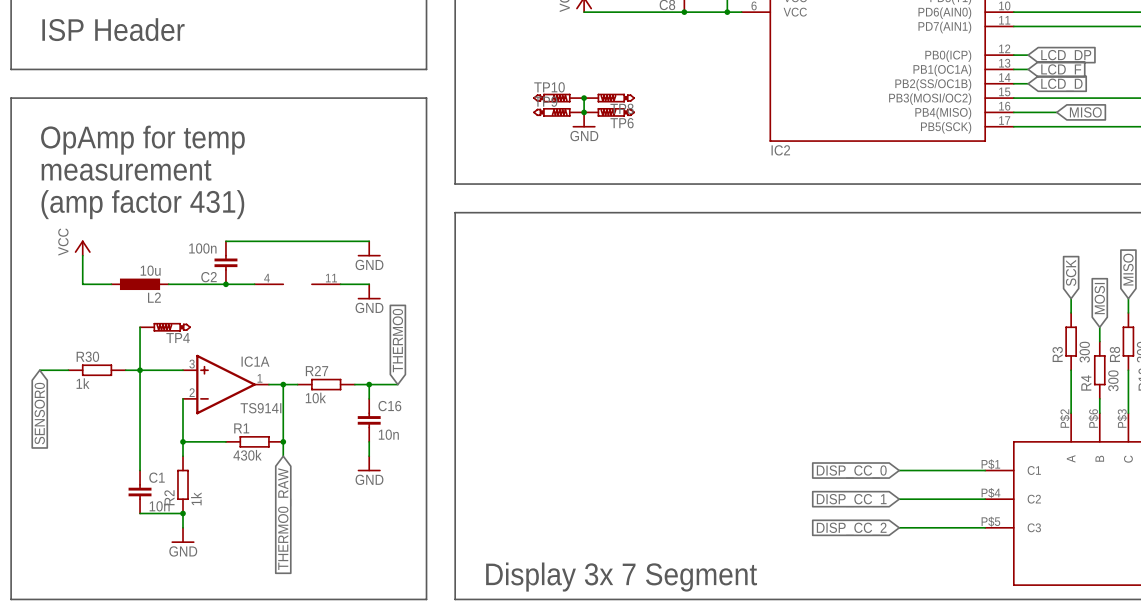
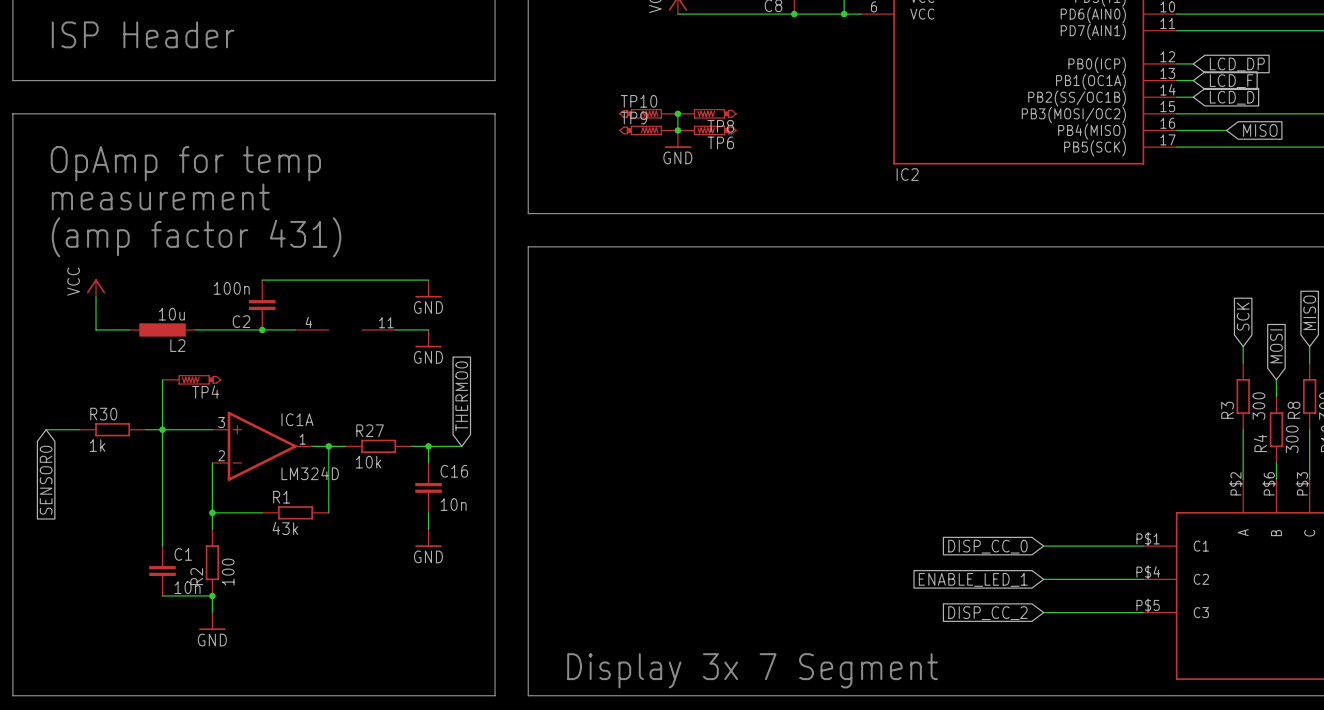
IC1A value: TS914I (260, 408) -> LM324D (310, 473)
wire: (283, 441) (283, 456) -> none
junction: (283, 441) -> none
R1 value: 430k (247, 455) -> 43k (285, 528)
R2 value: 1k (196, 498) -> 100 (228, 572)
global label: DISP_CC_1 (851, 500) -> ENABLE_LED_1 (973, 579)
global label: THERMO0_RAW (284, 519) -> none

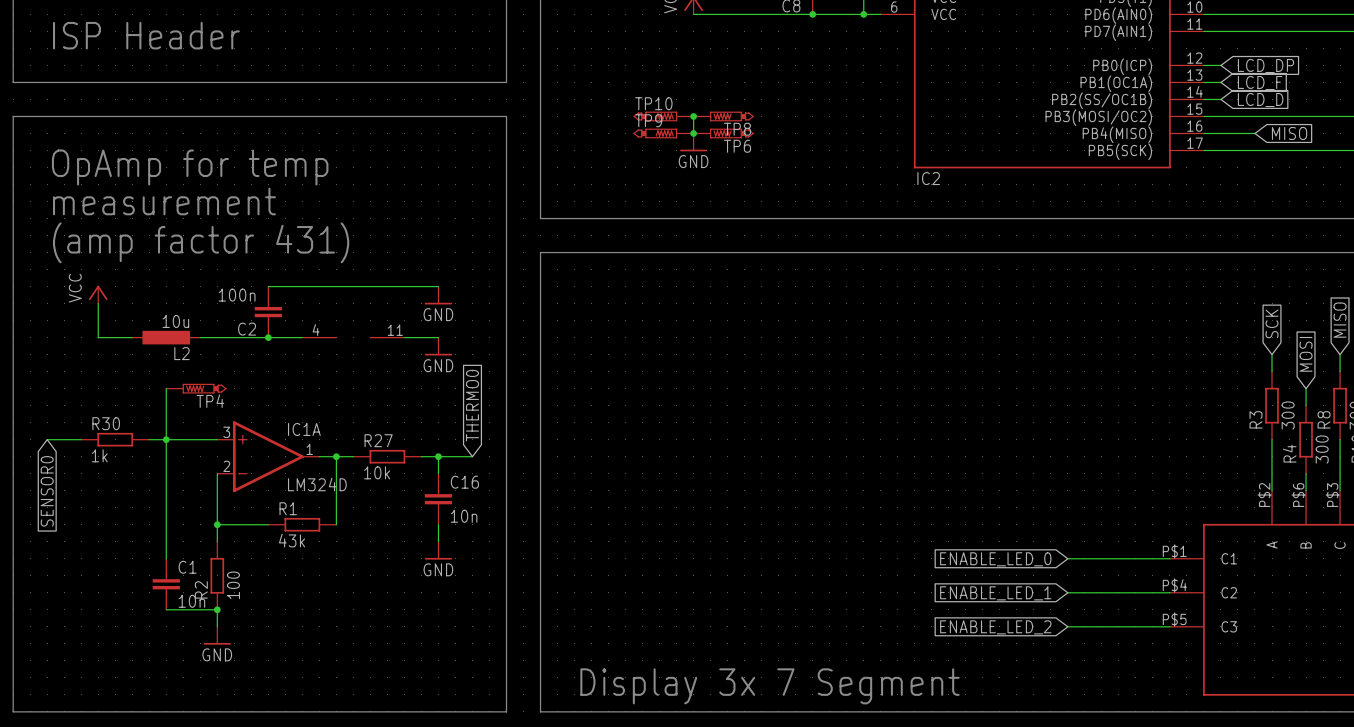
global label: DISP_CC_0 (987, 546) -> ENABLE_LED_0 (995, 559)
global label: DISP_CC_2 (987, 613) -> ENABLE_LED_2 (995, 627)

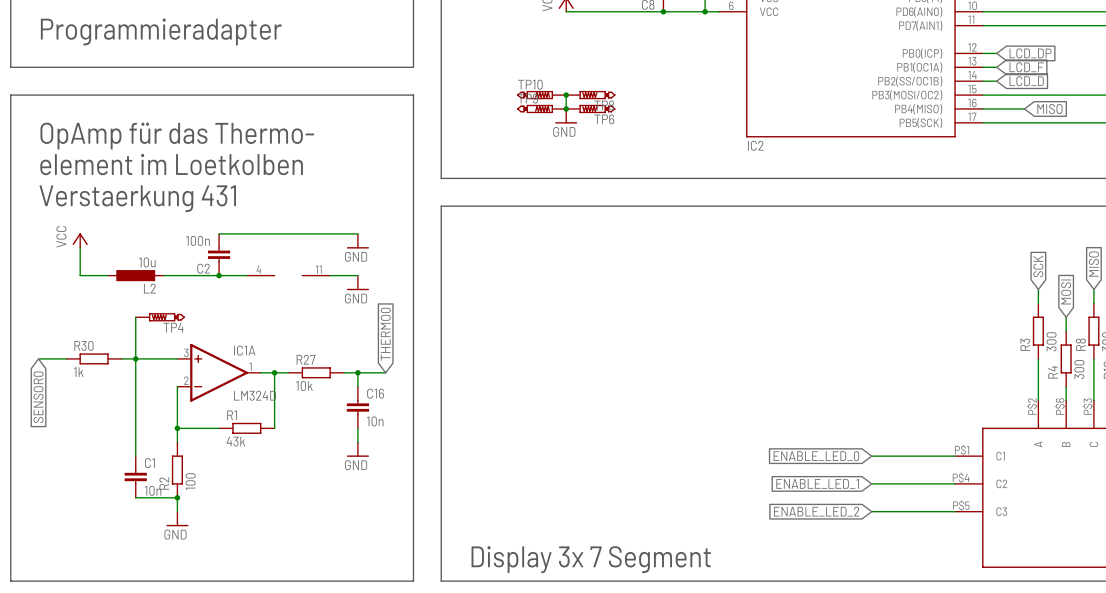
text: ISP Header (146, 35) -> Programmieradapter (161, 31)
text: OpAmp for temp (190, 167) -> OpAmp für das Thermo- (177, 136)
text: measurement (164, 201) -> element im Loetkolben (171, 164)
text: (amp factor 431) (201, 242) -> Verstaerkung 431 (137, 198)

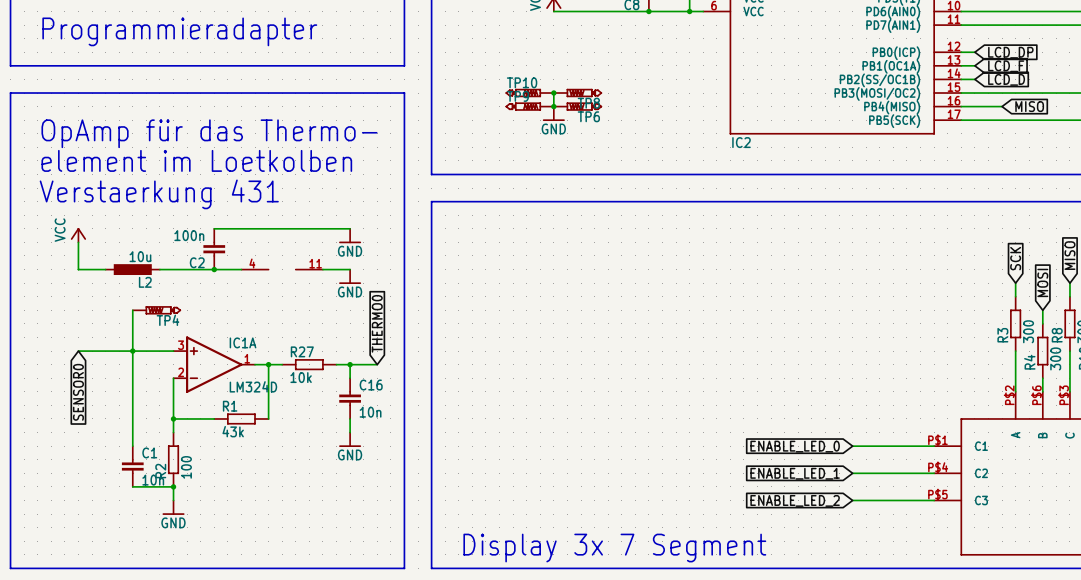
wire: (38, 358) (66, 358) -> none
wire: none -> (78, 351) (119, 351)
R30: 1k (94, 358) -> none
global label position: SENSOR0 (38, 397) -> SENSOR0 (78, 392)

